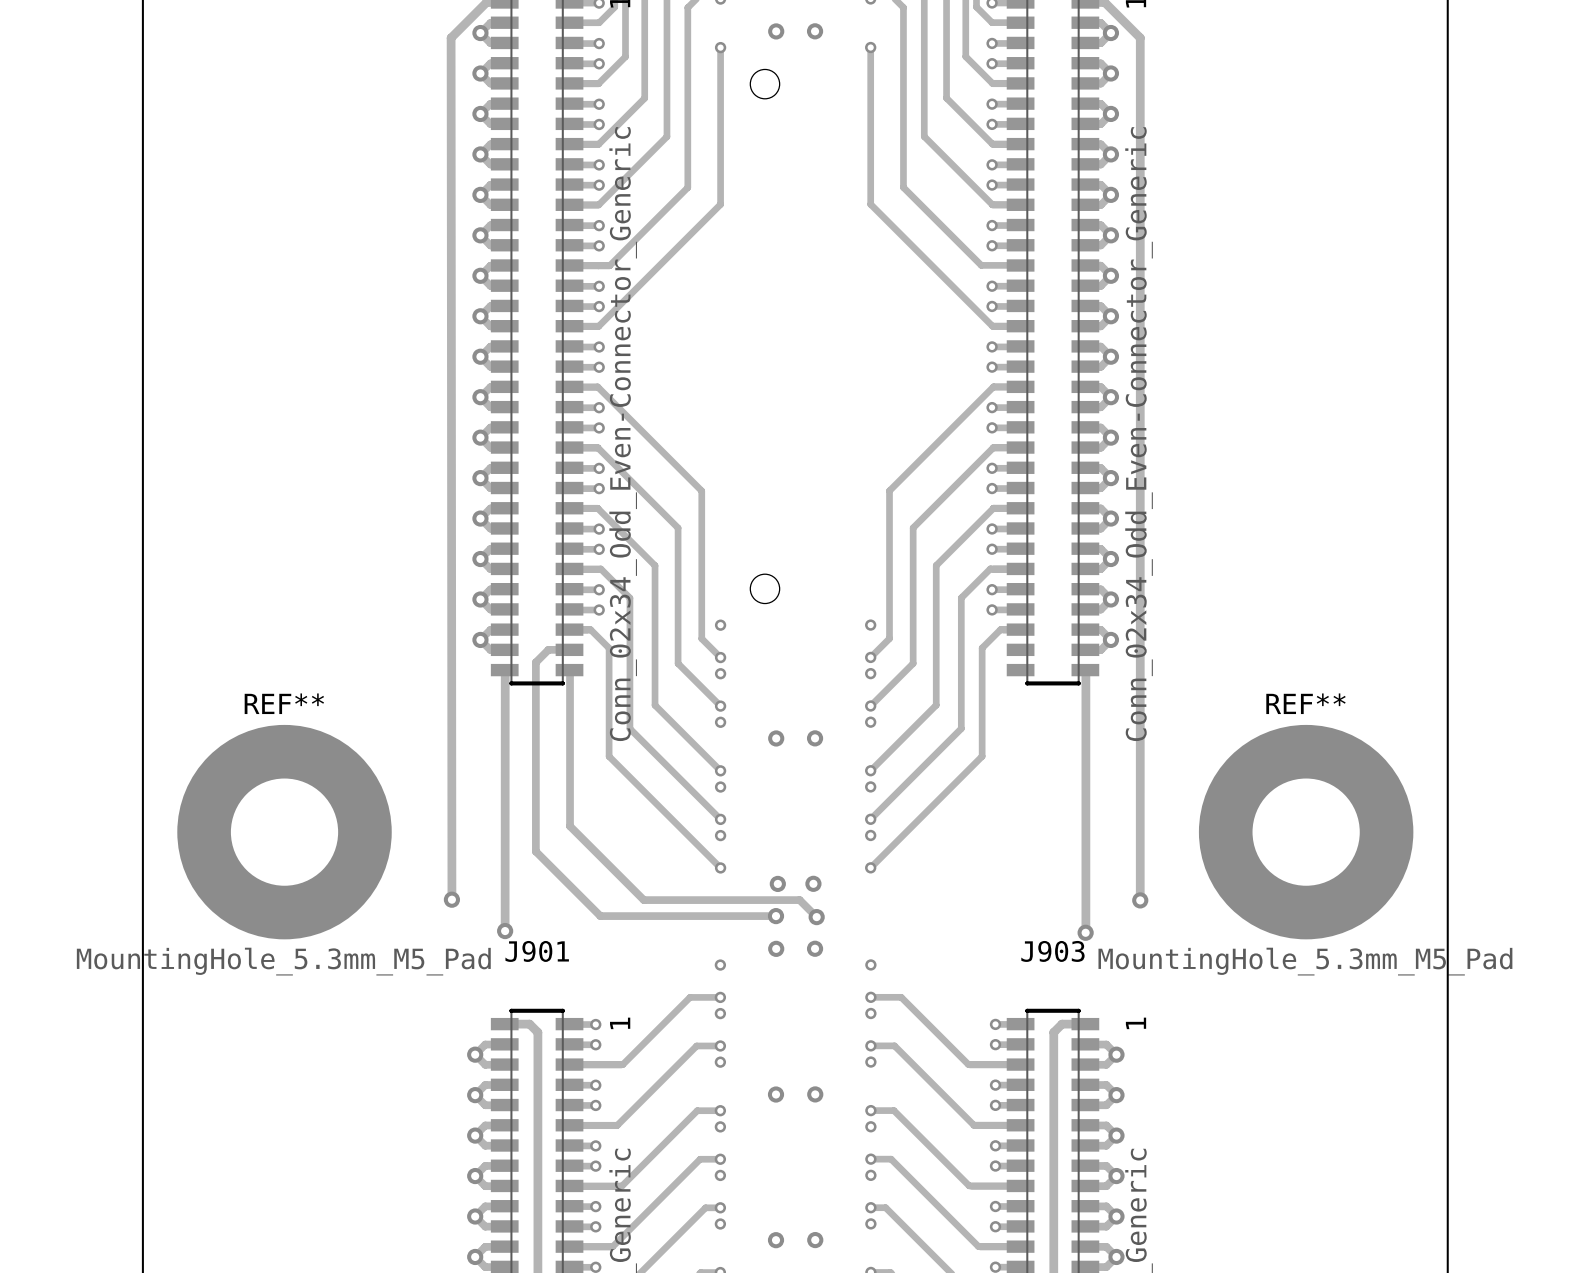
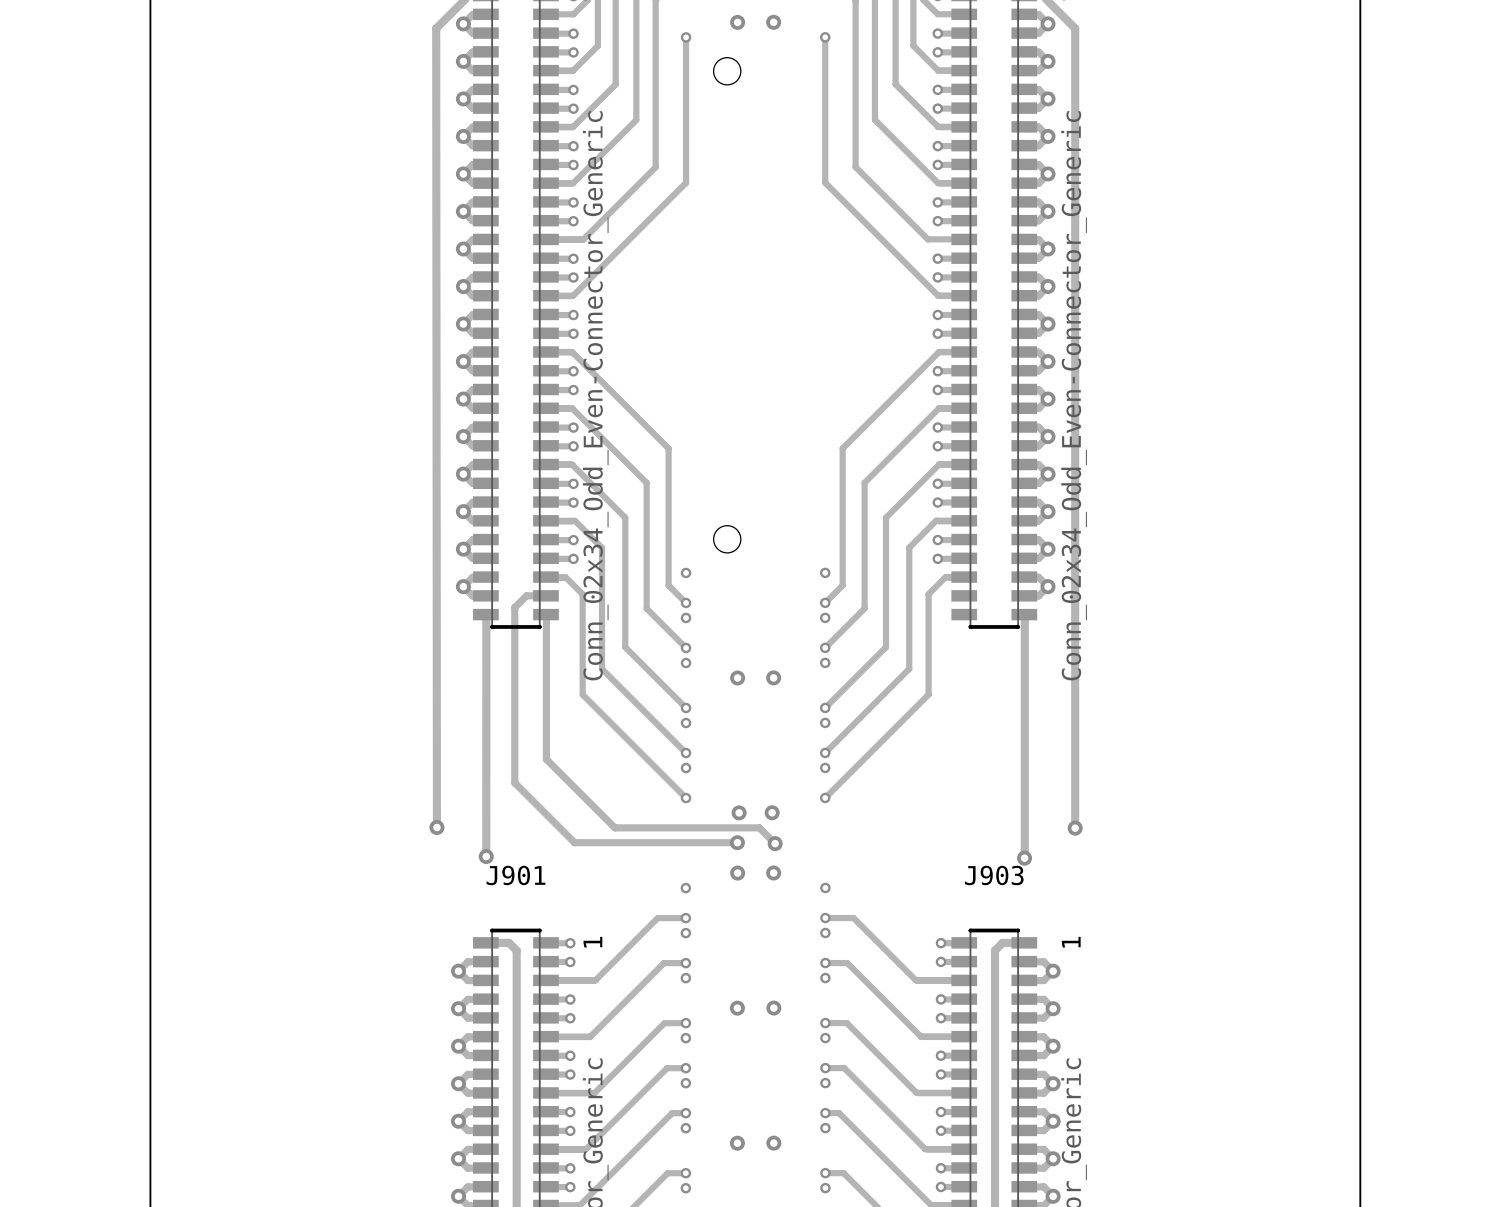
part: (284, 832) -> none
part: (1306, 832) -> none

